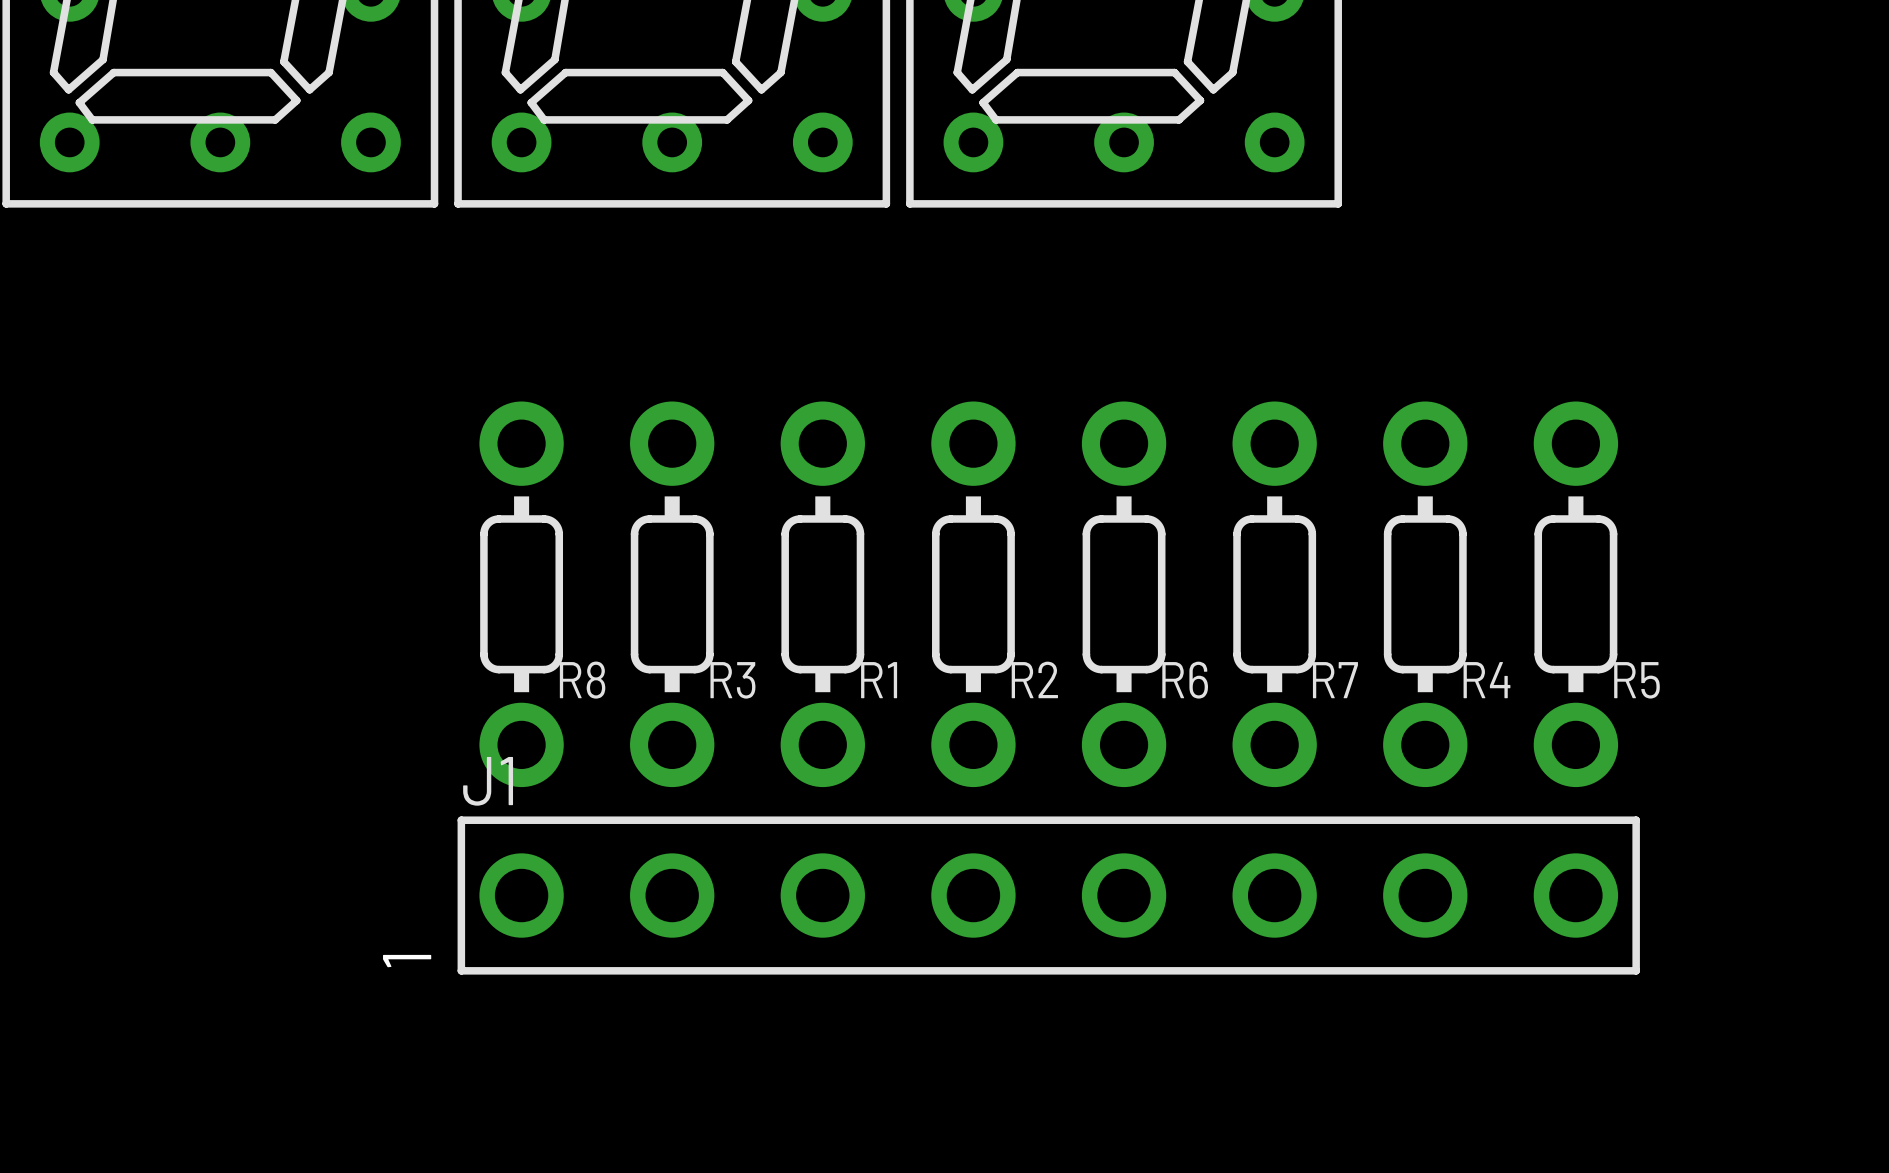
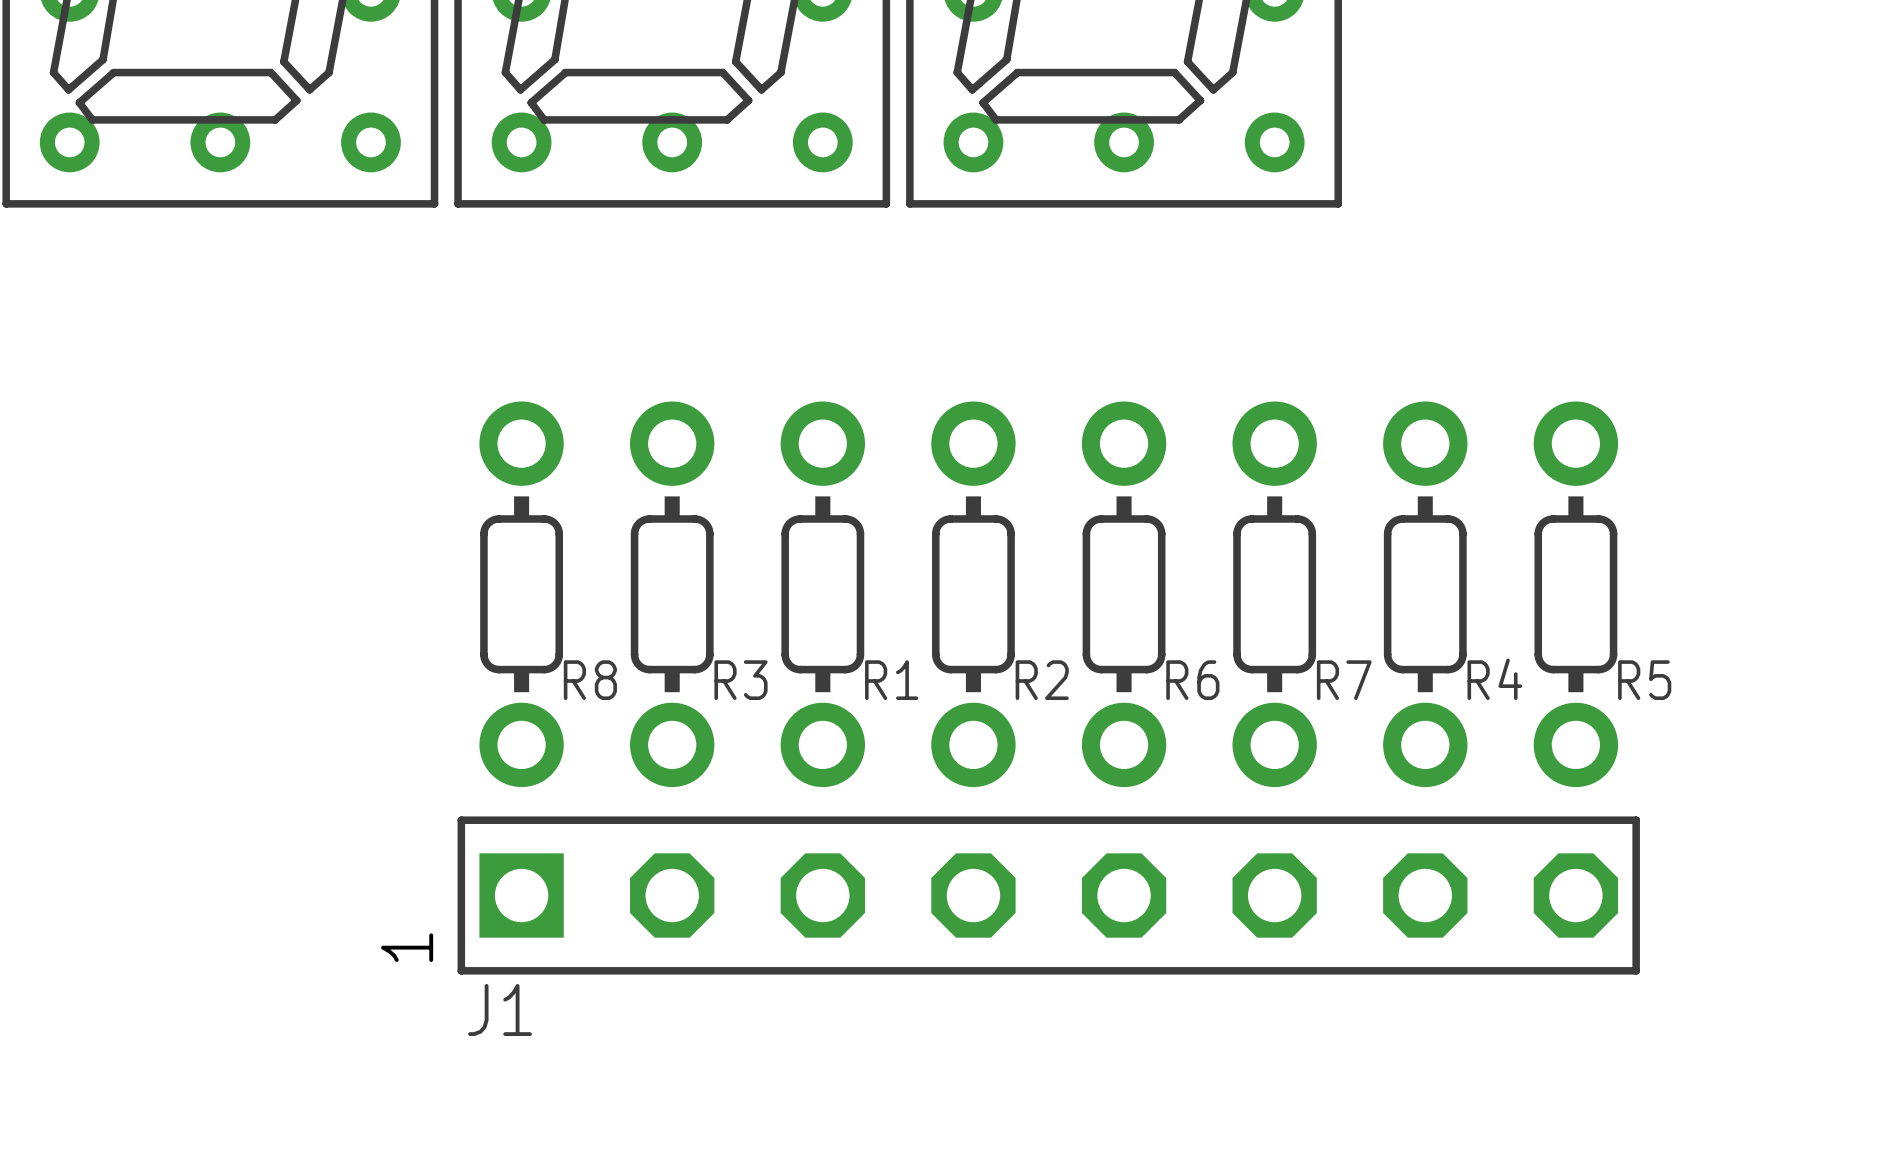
J1 name position: J1 (488, 781) -> J1 (500, 1009)
J1 footprint: [457, 816, 1640, 975] -> [457, 816, 1640, 975]

